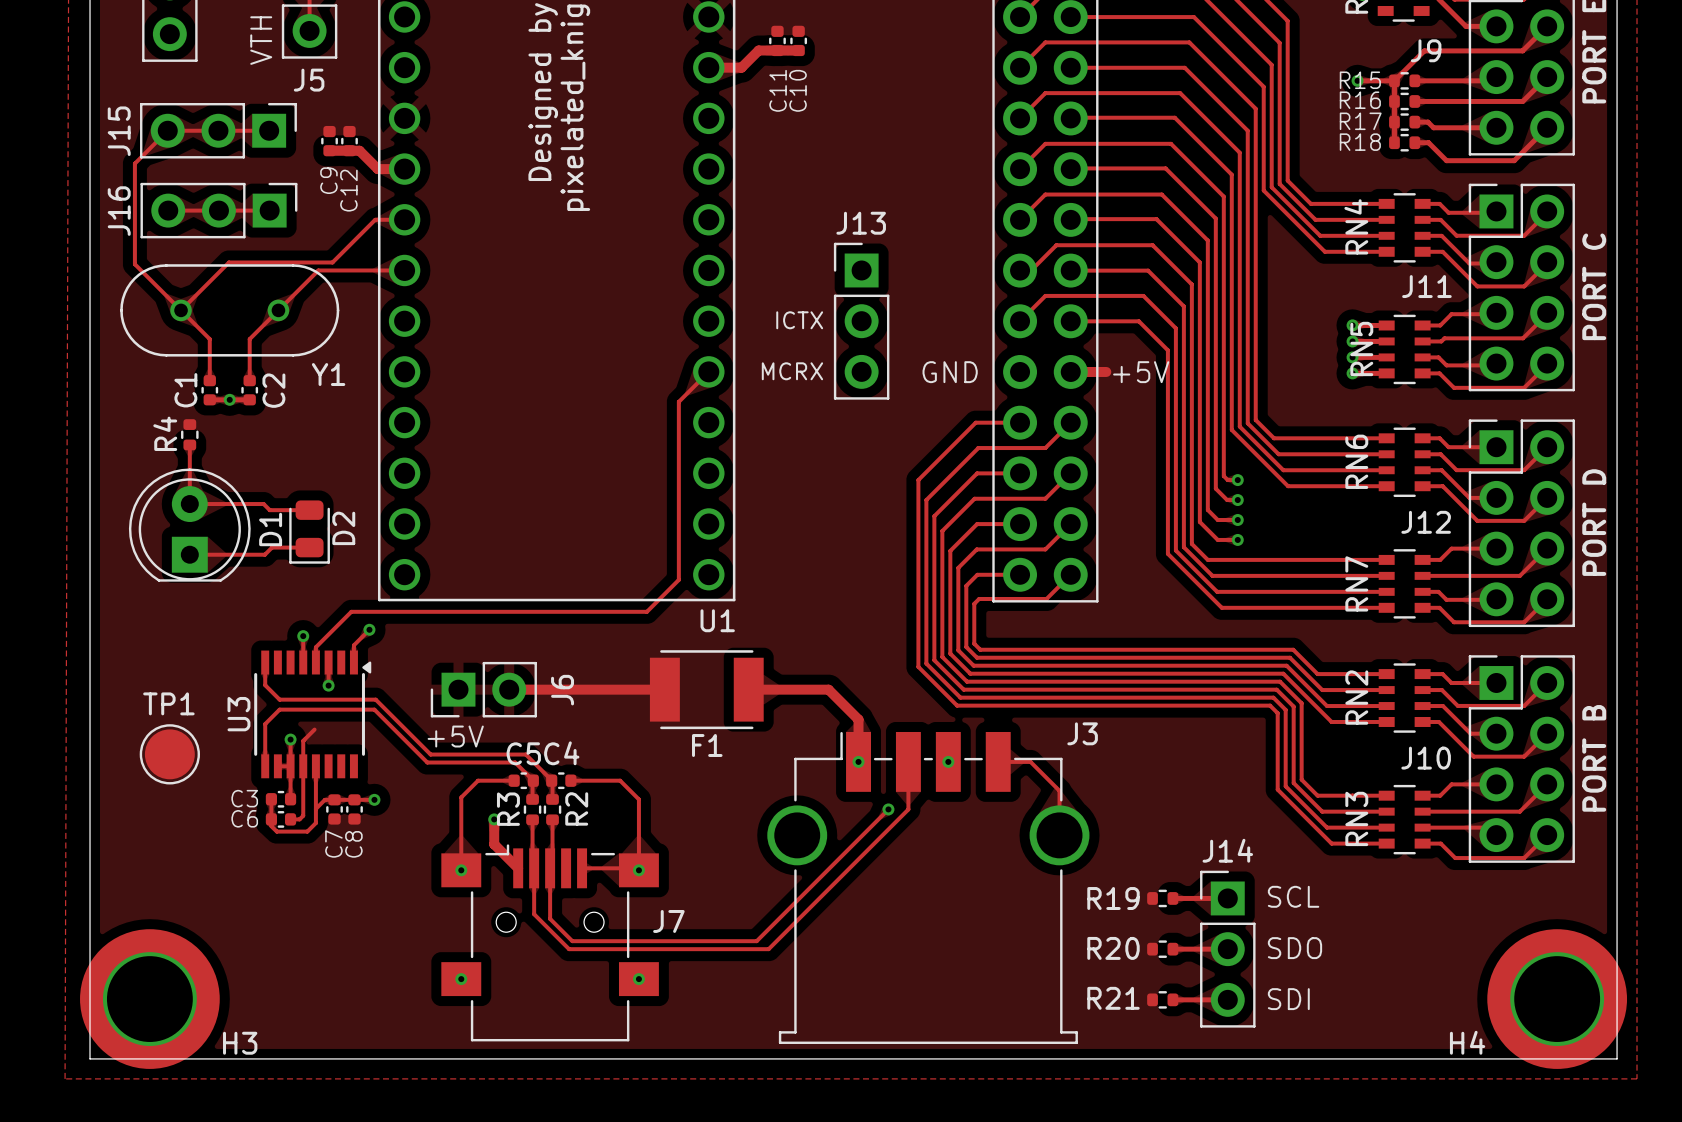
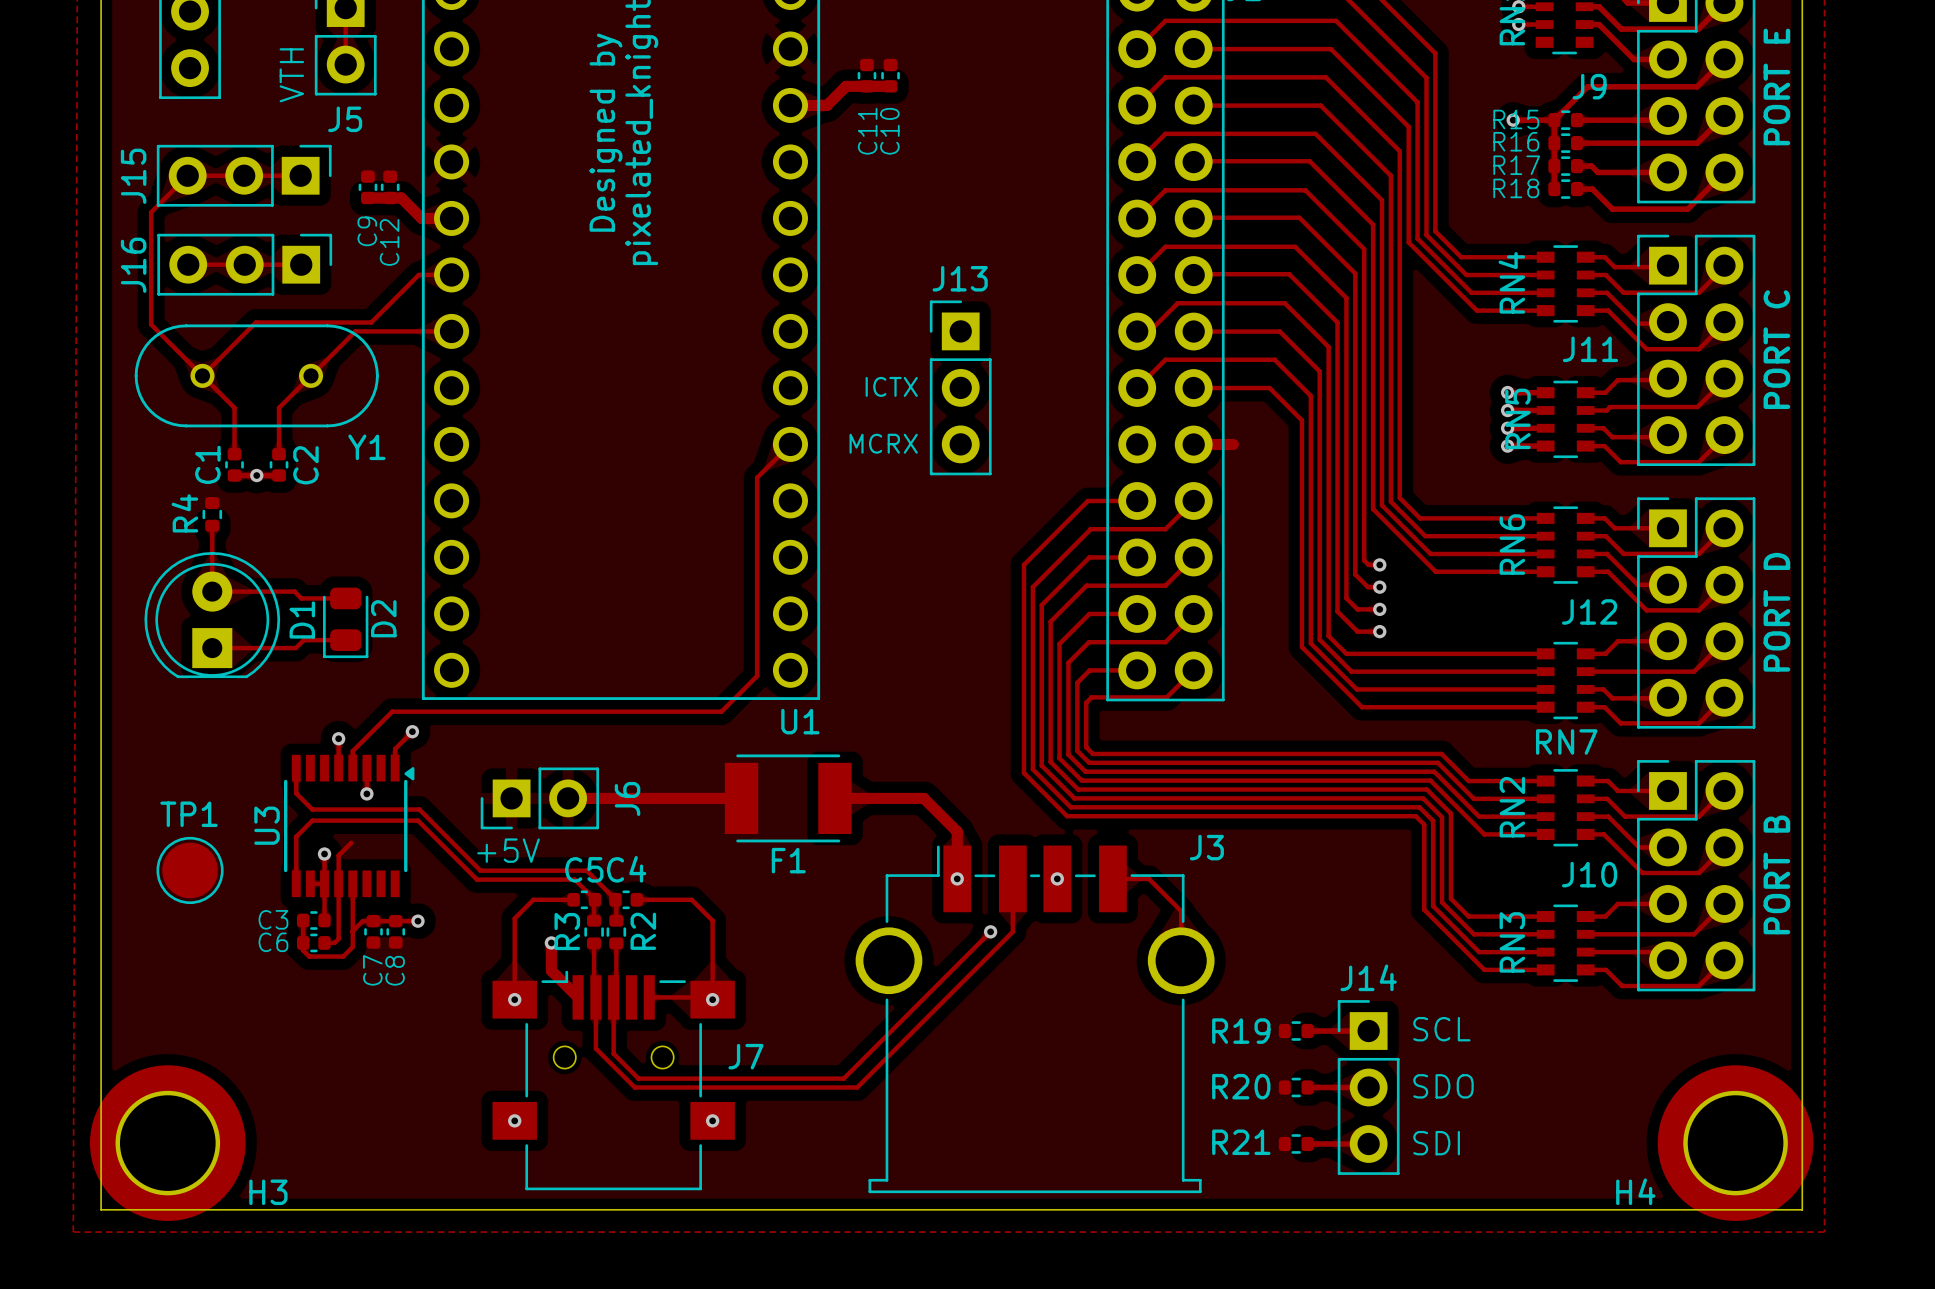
text: GND (950, 372) -> none
text: +5V (1141, 372) -> none
RN7 name rotation: 0° (1356, 583) -> 90° clockwise (1566, 741)
RN7 name position: RN7 (1356, 583) -> RN7 (1566, 741)

